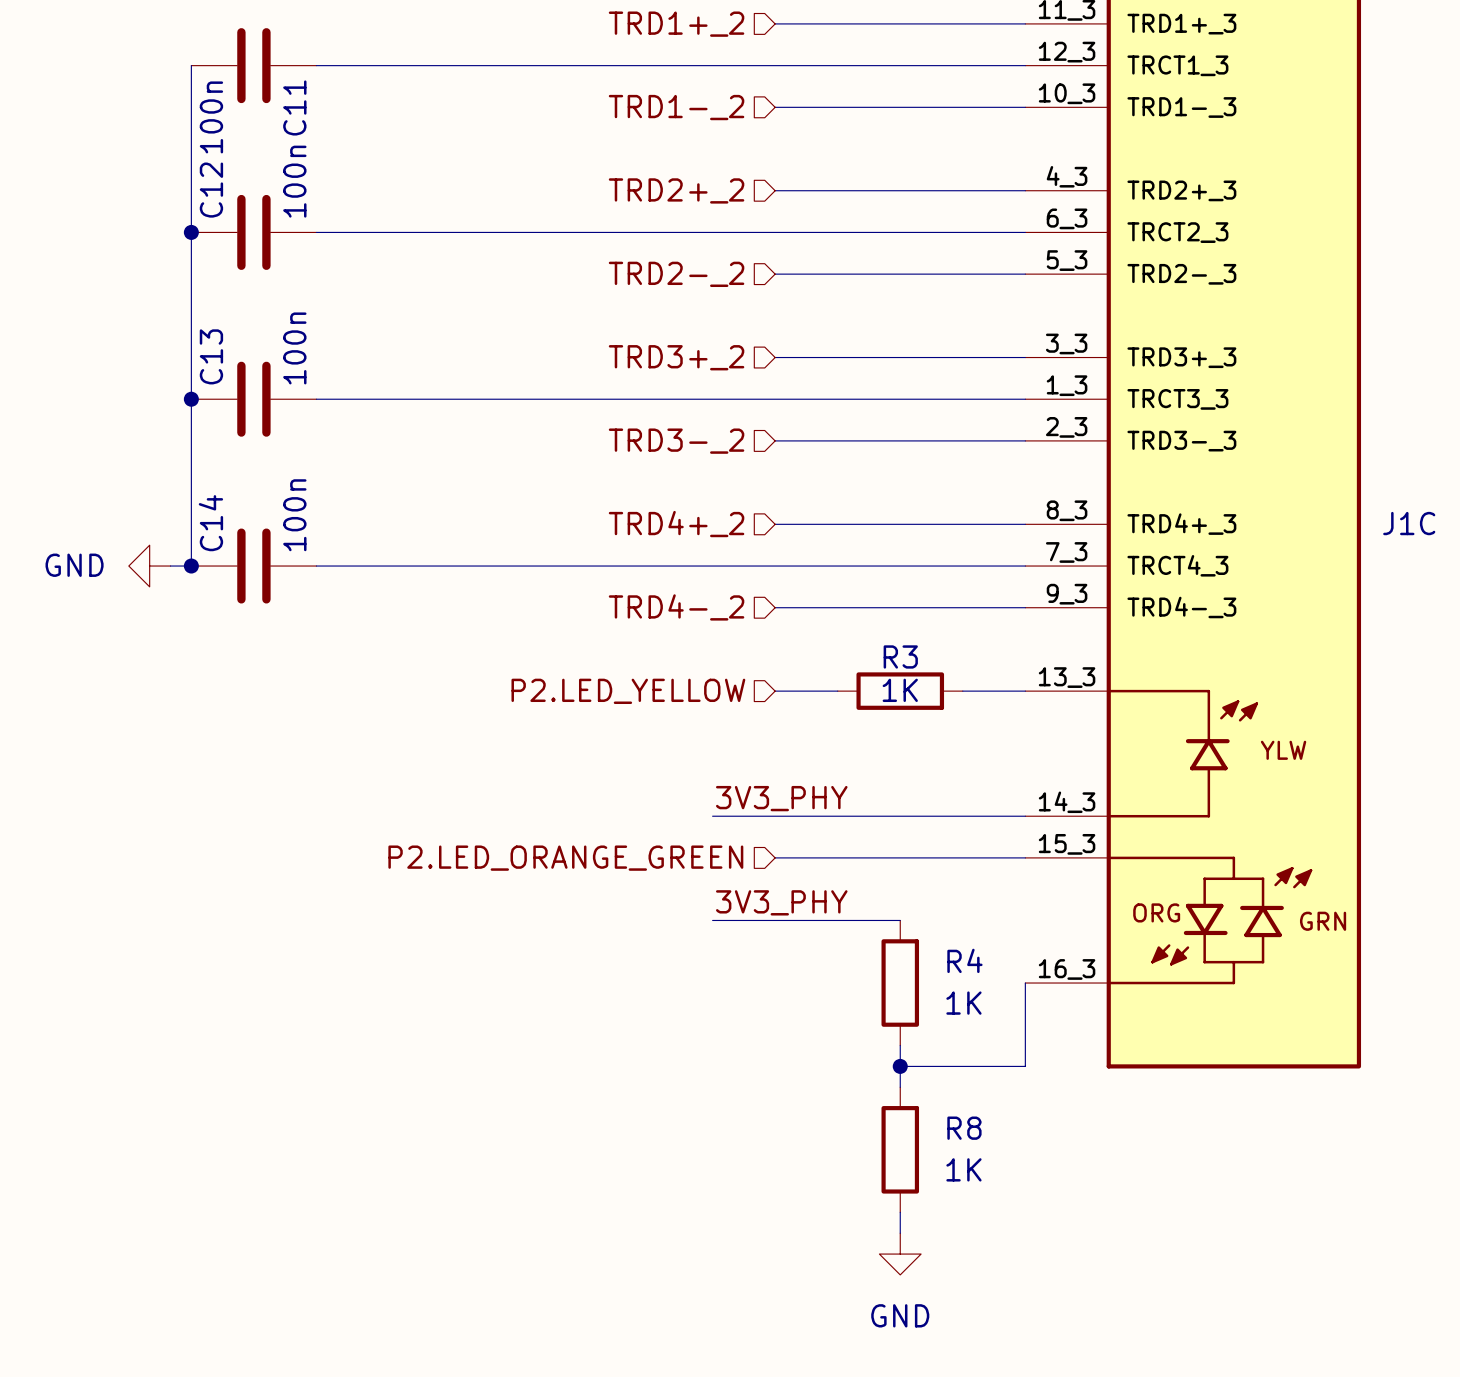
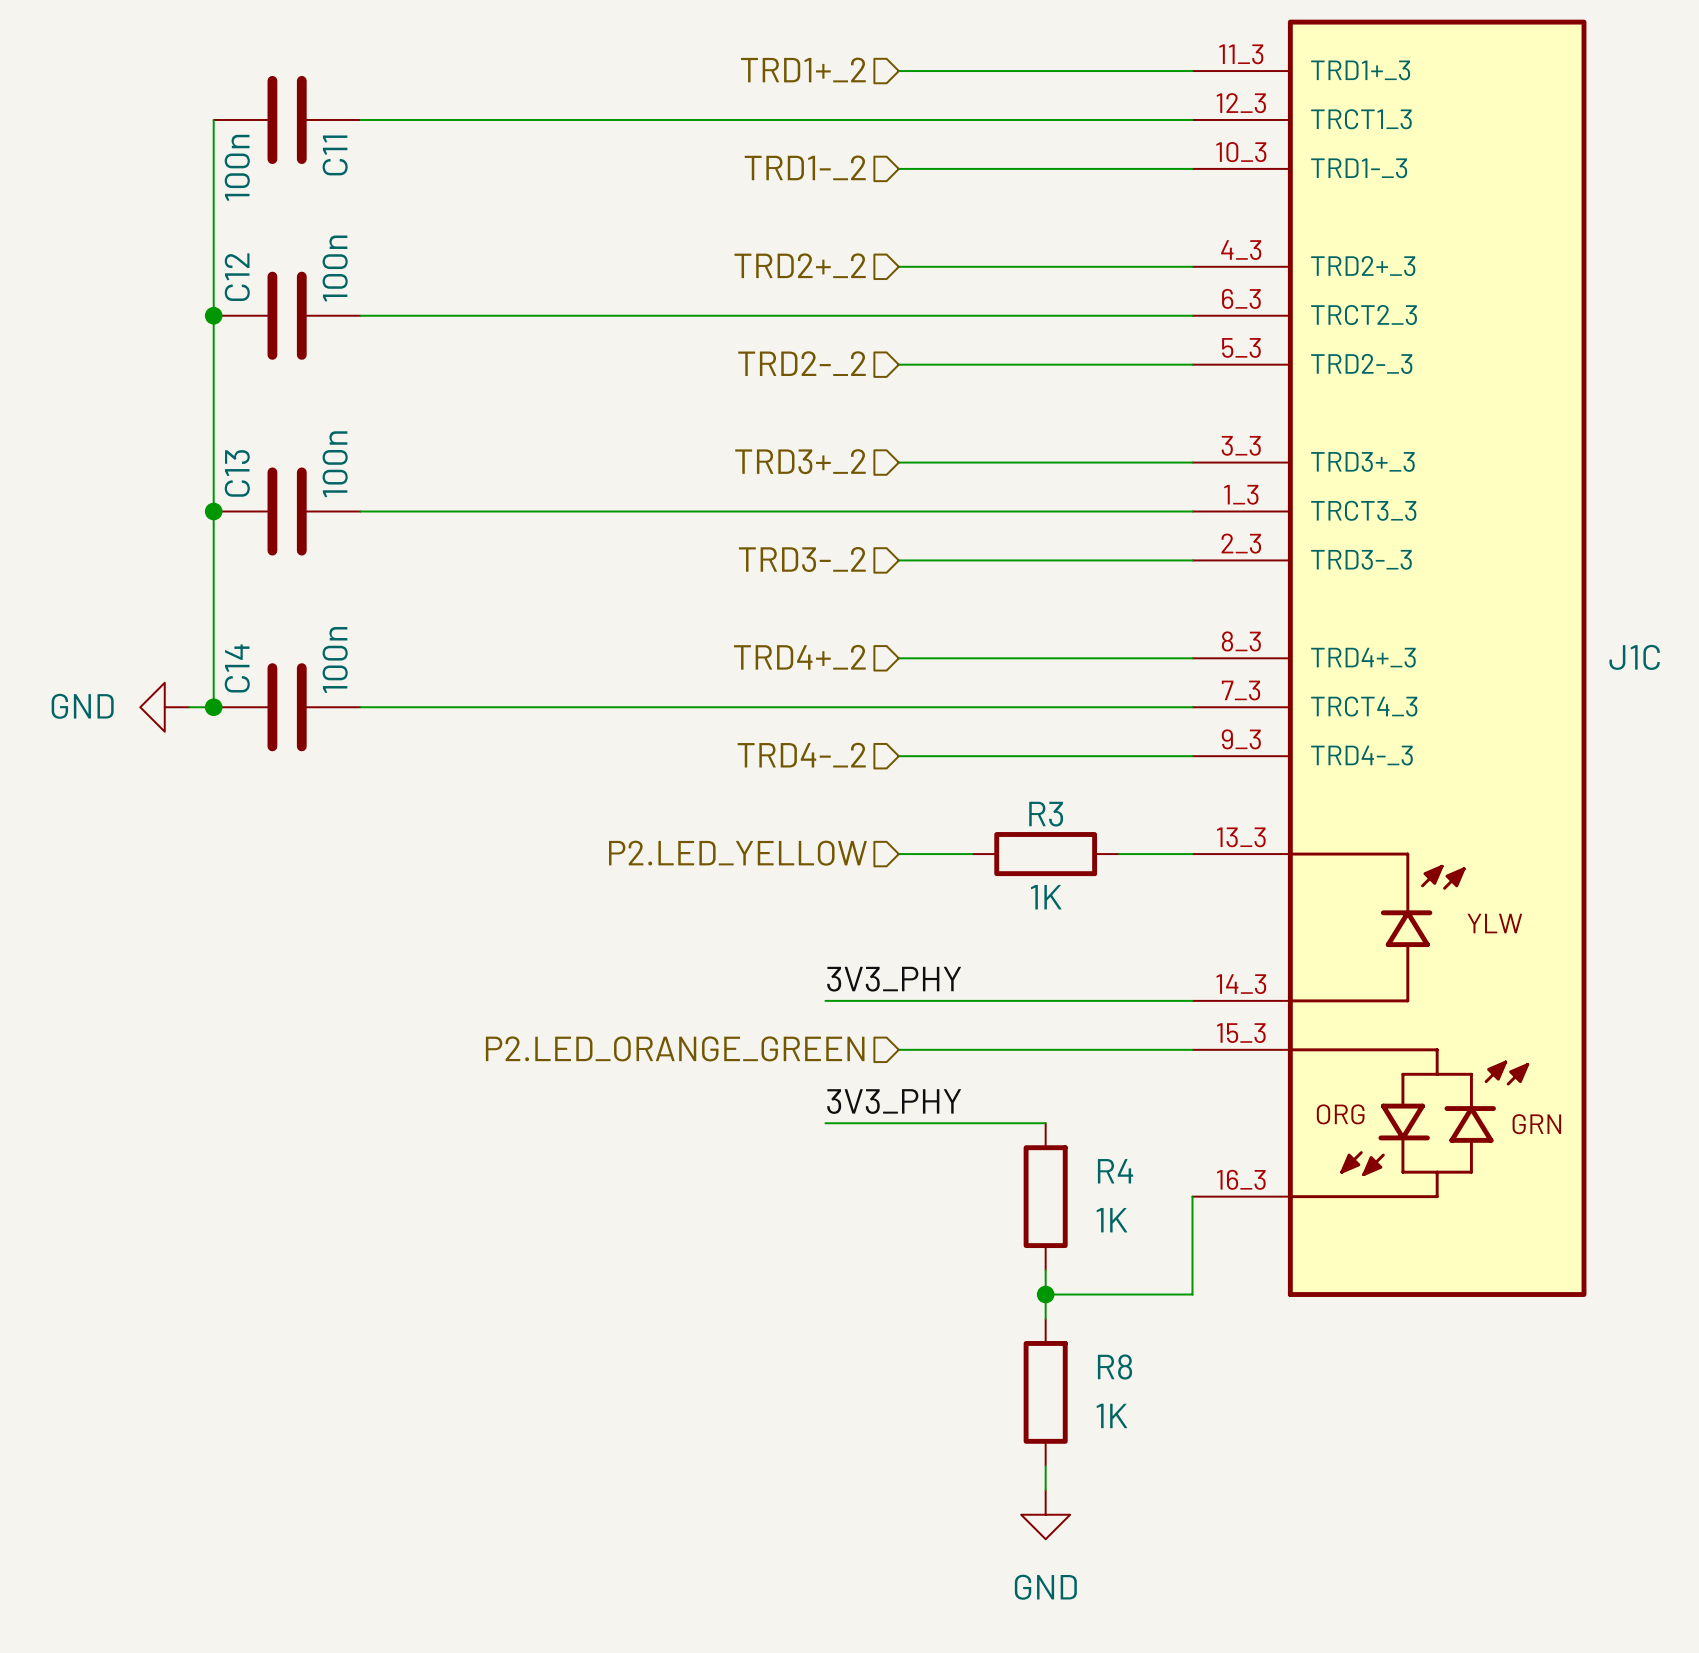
R3 value position: 1K (900, 690) -> 1K (1046, 897)

